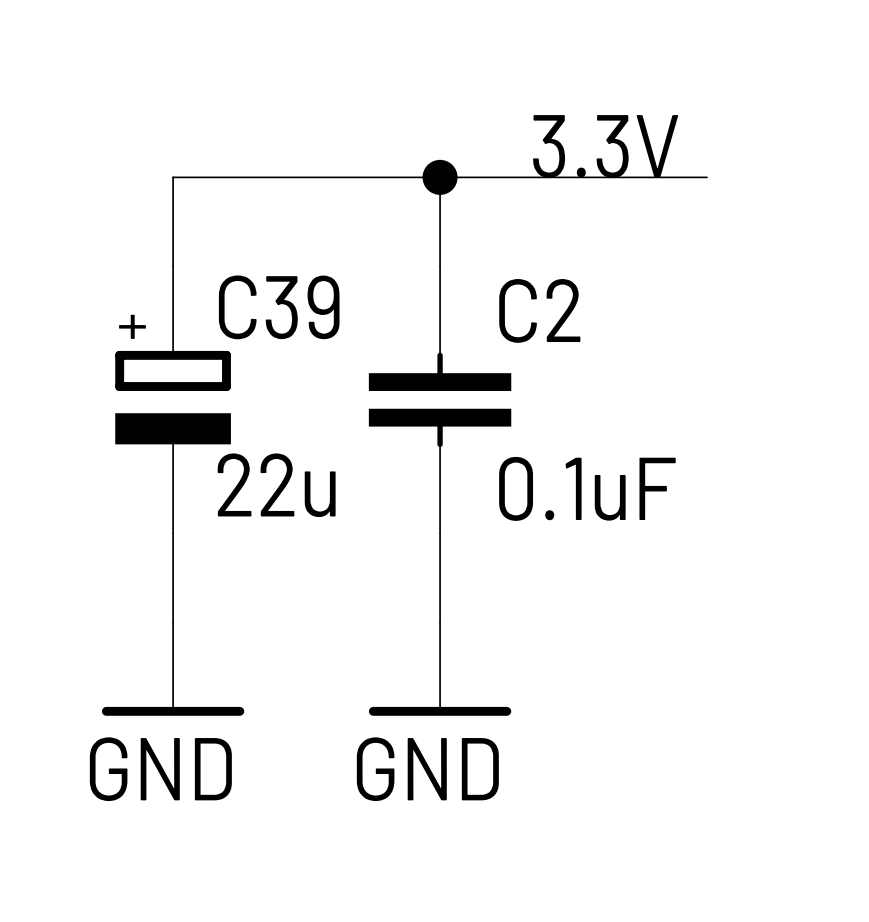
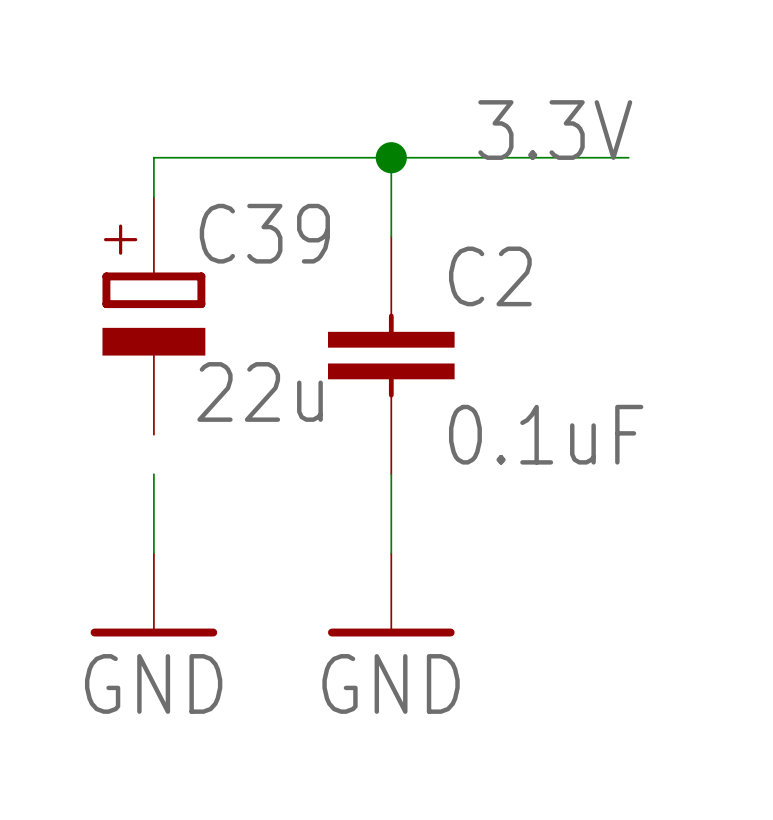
C39 position: (173, 399) -> (153, 315)

